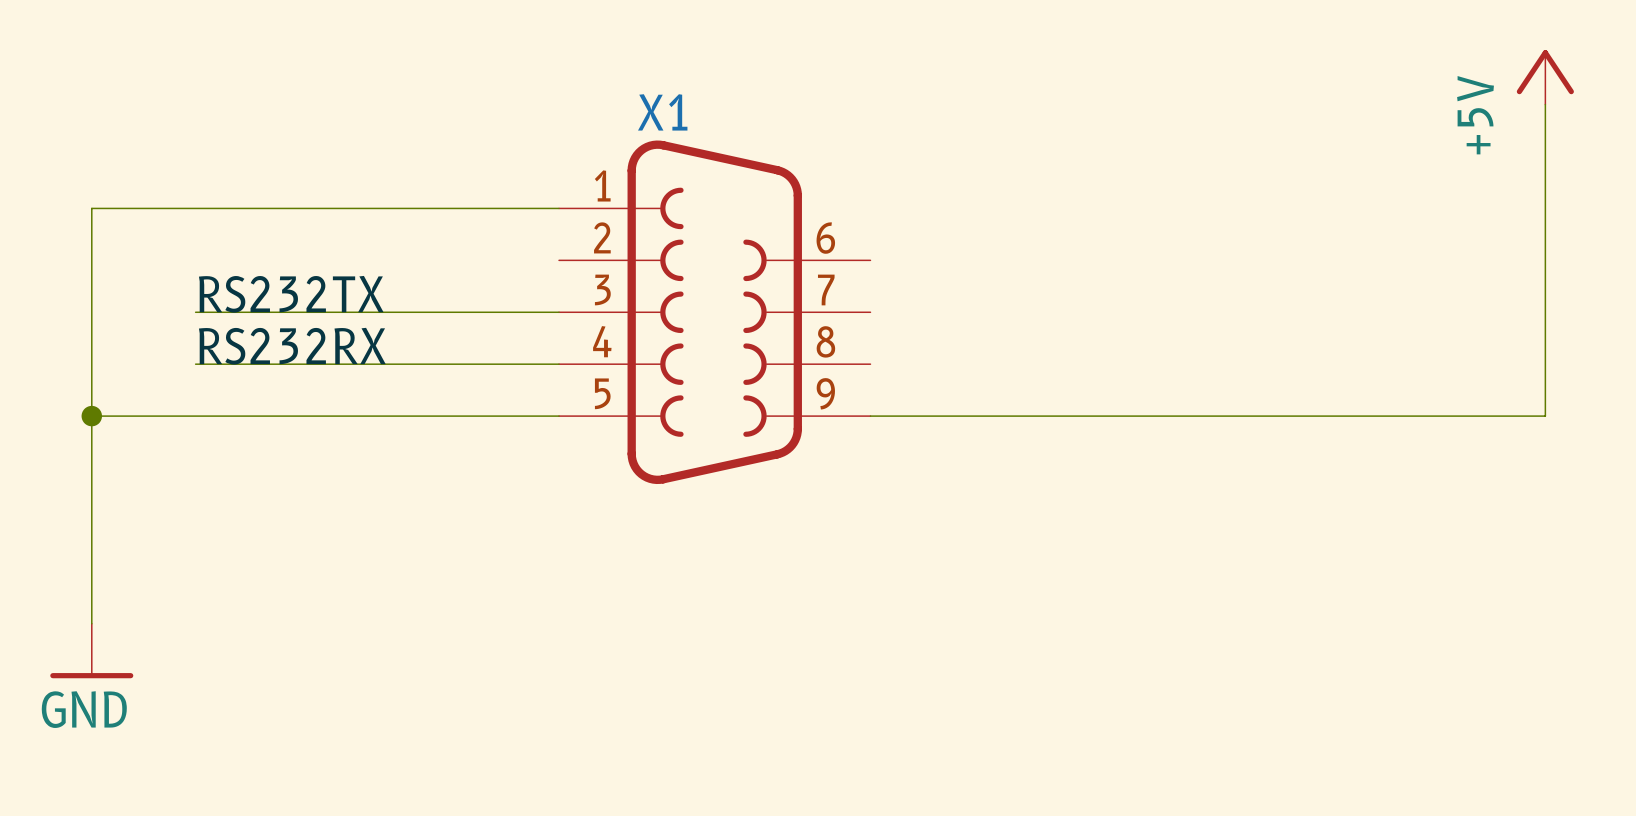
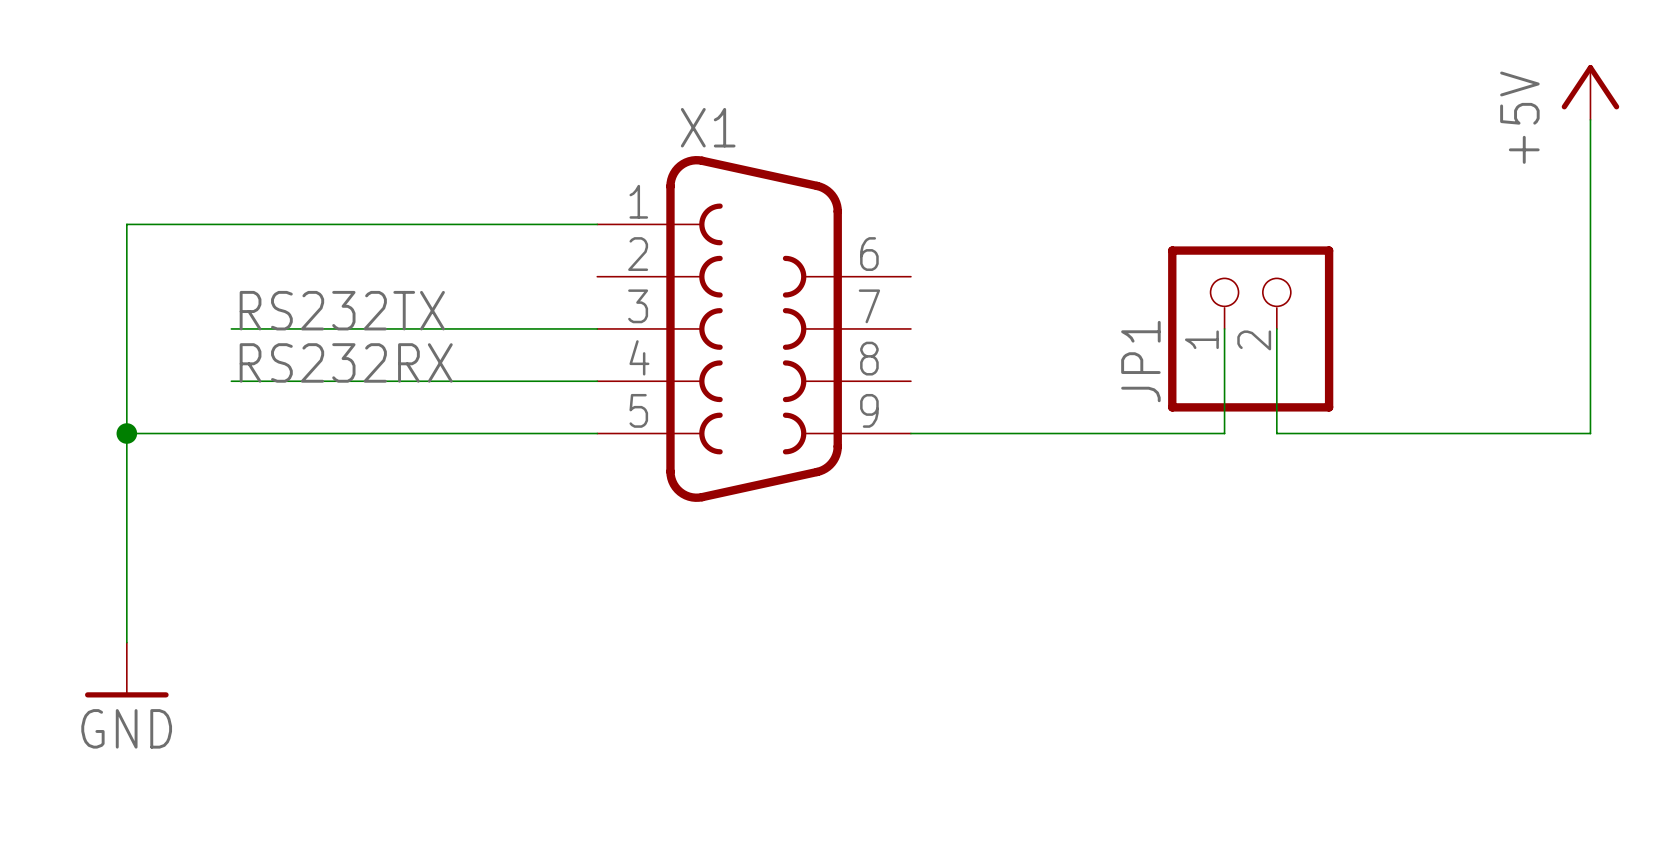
JP1: none -> (1250, 328)
wire: none -> (1276, 328) (1276, 433)
wire: (1181, 416) (1233, 416) -> (1224, 433) (1224, 328)

